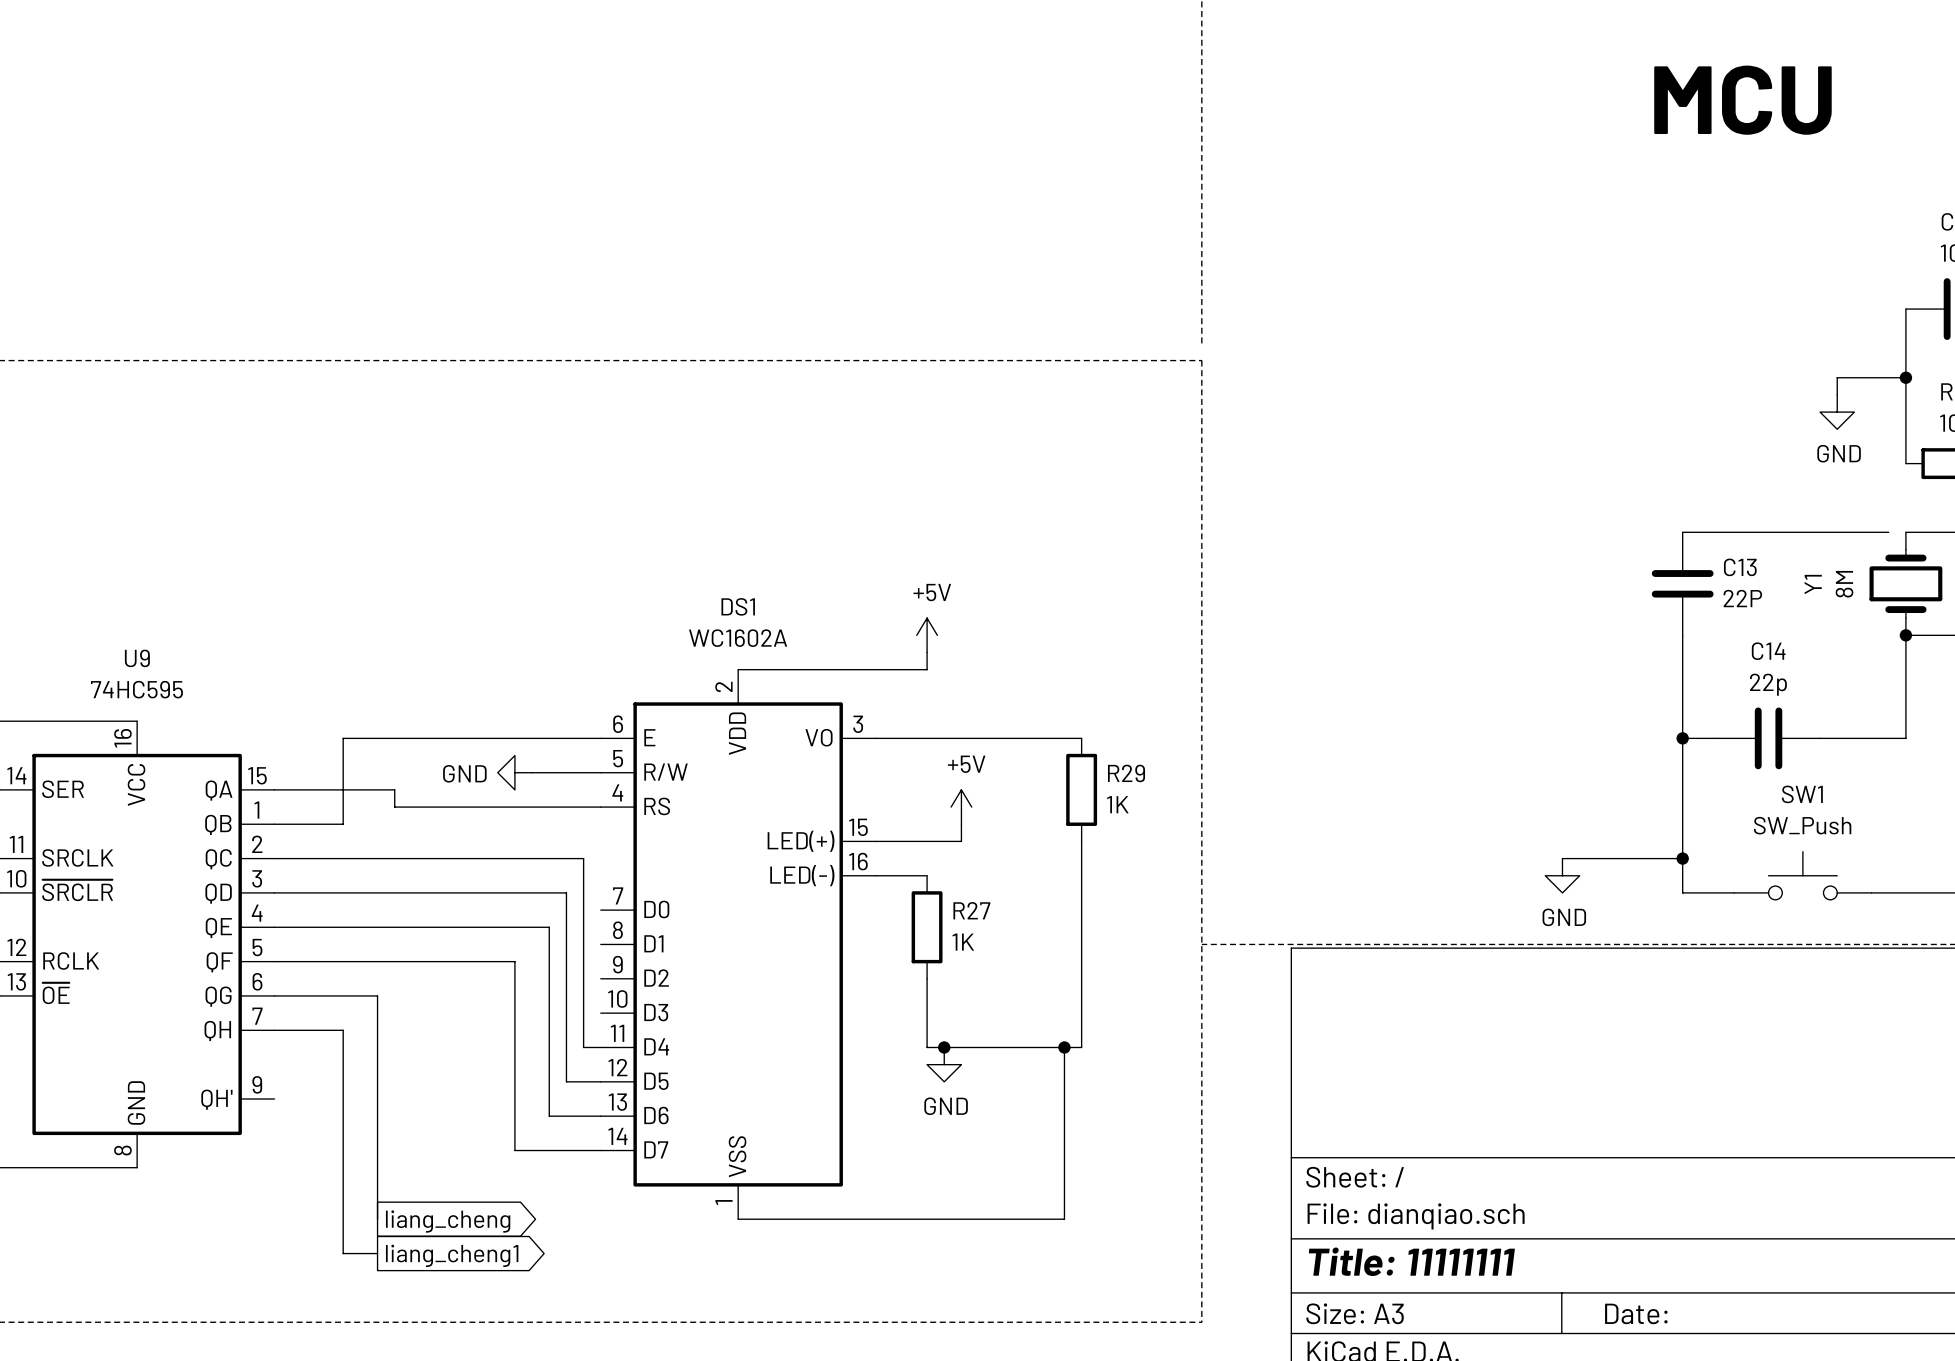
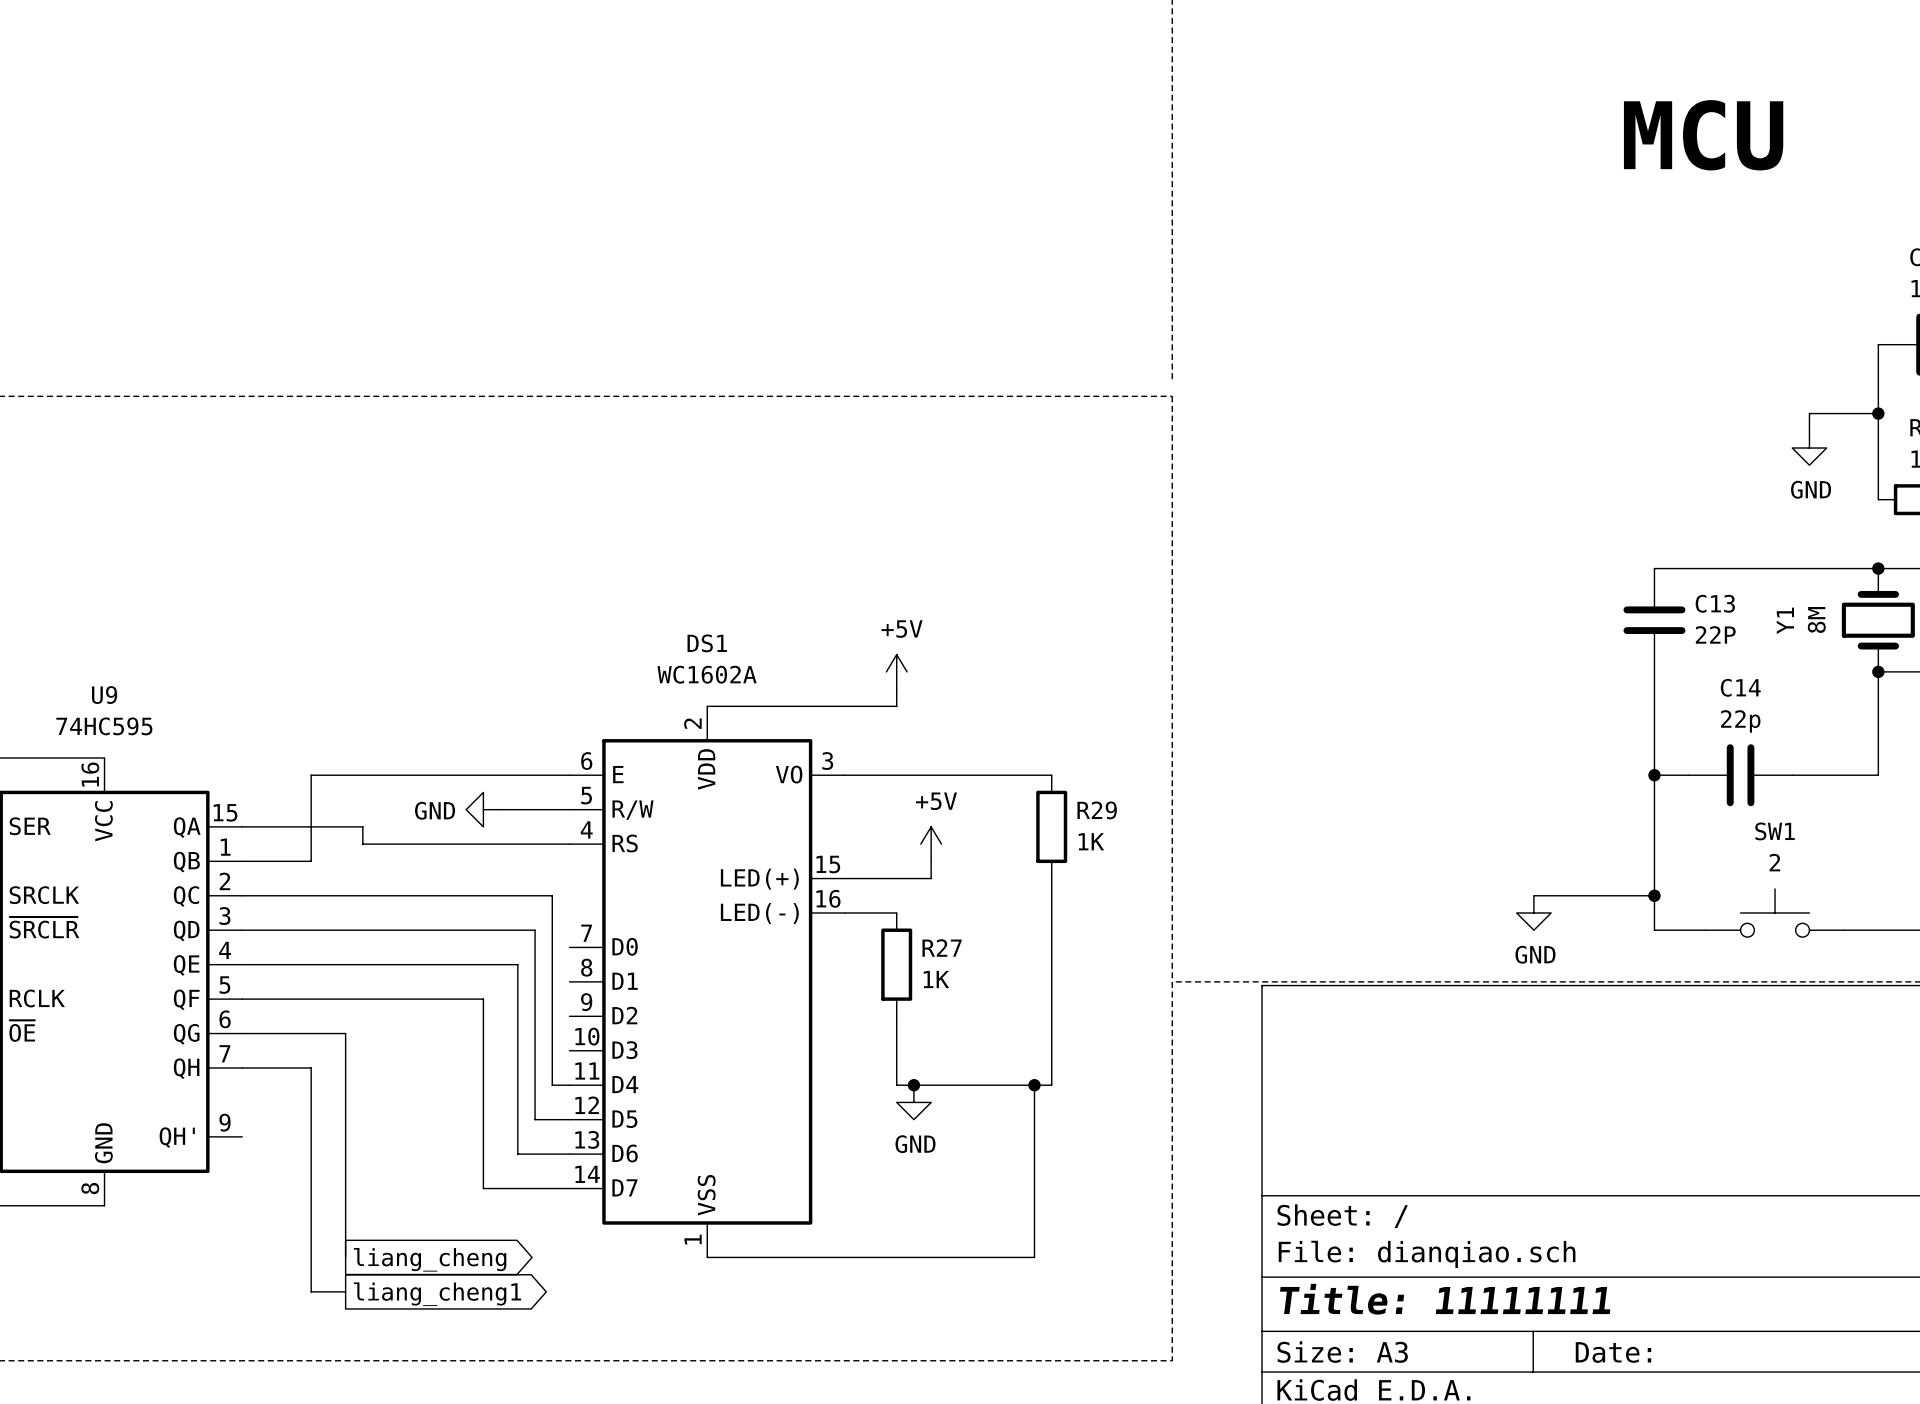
wire: none -> (1861, 568) (1878, 568)
junction: none -> (1878, 568)
SW1 value: SW_Push (1802, 825) -> 2 (1774, 862)

